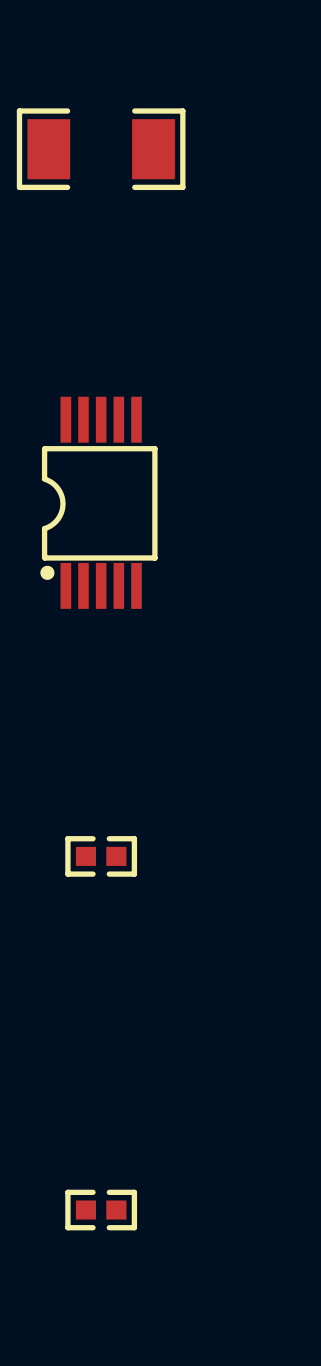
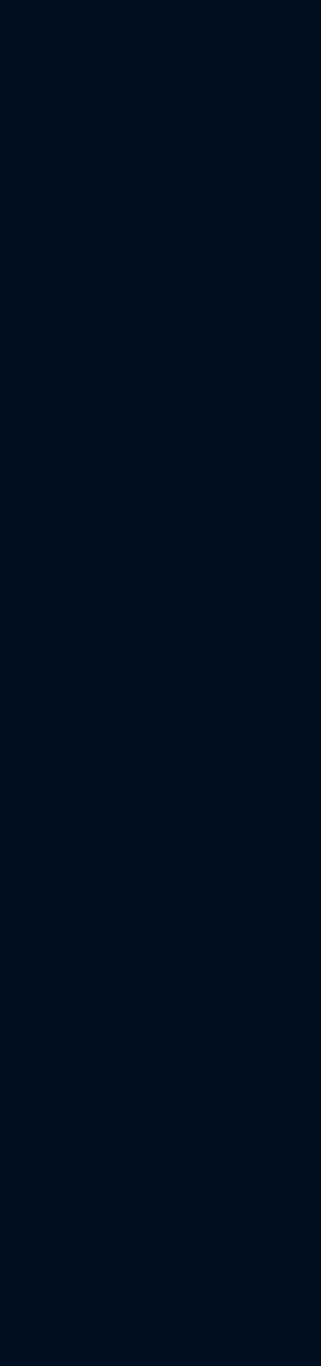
part: (101, 149) -> none
part: (98, 502) -> none
part: (101, 856) -> none
part: (101, 1210) -> none

